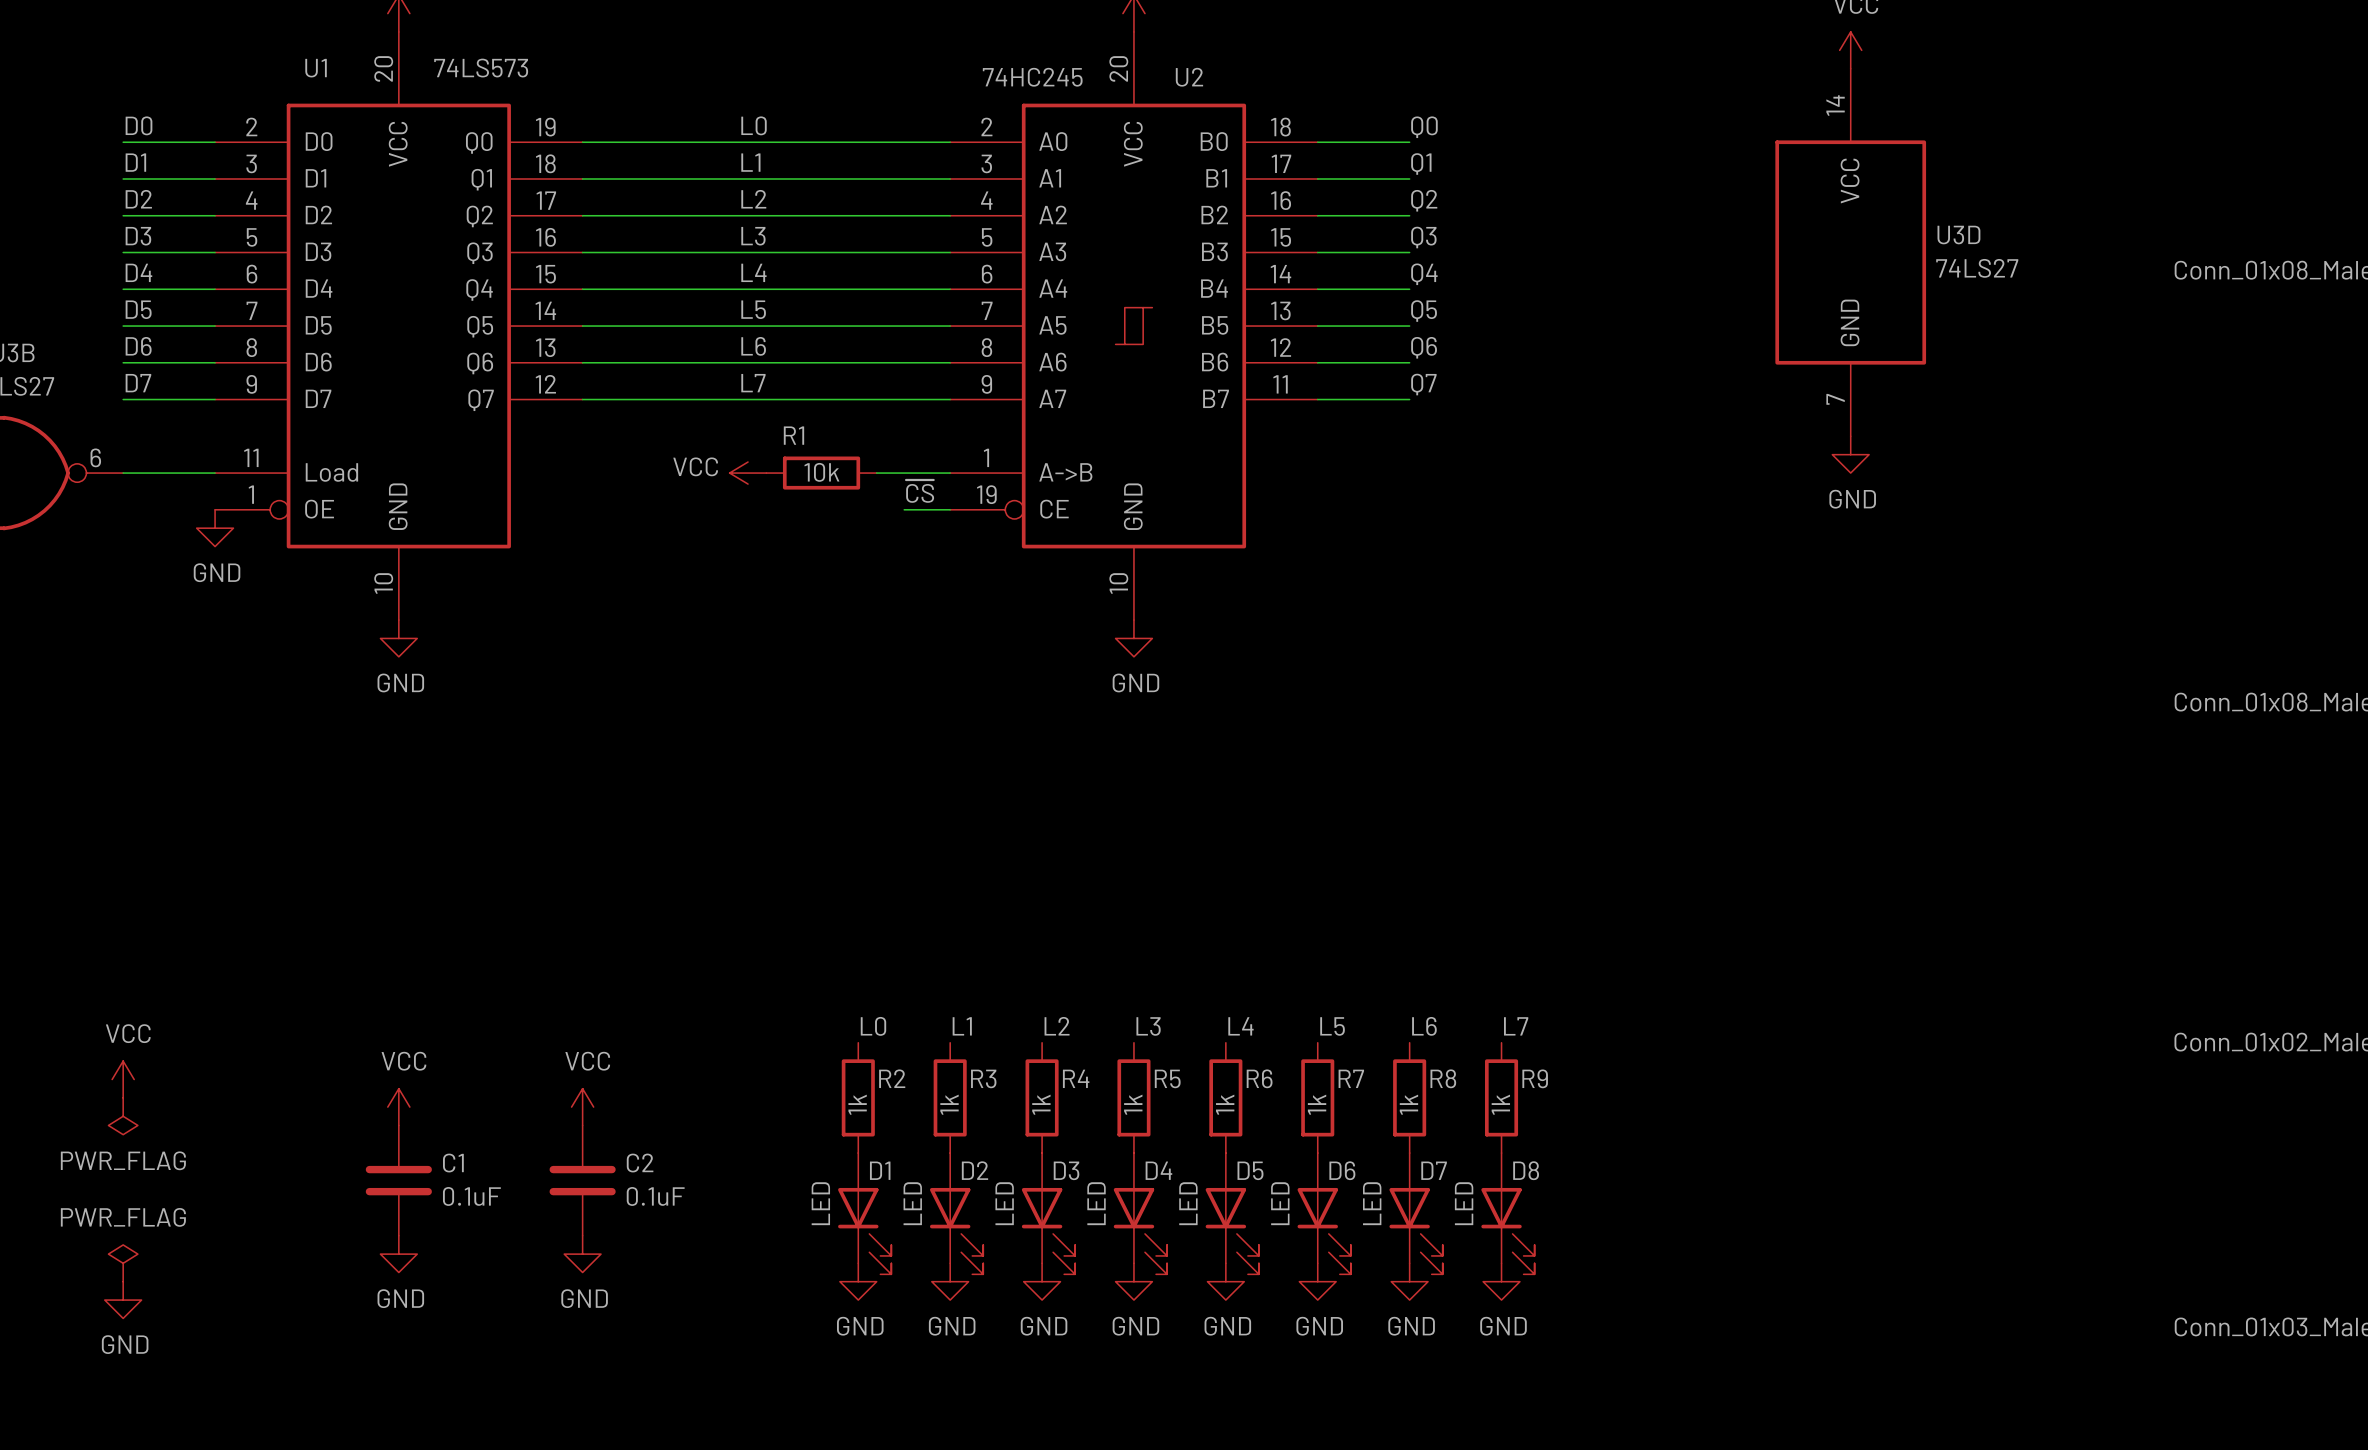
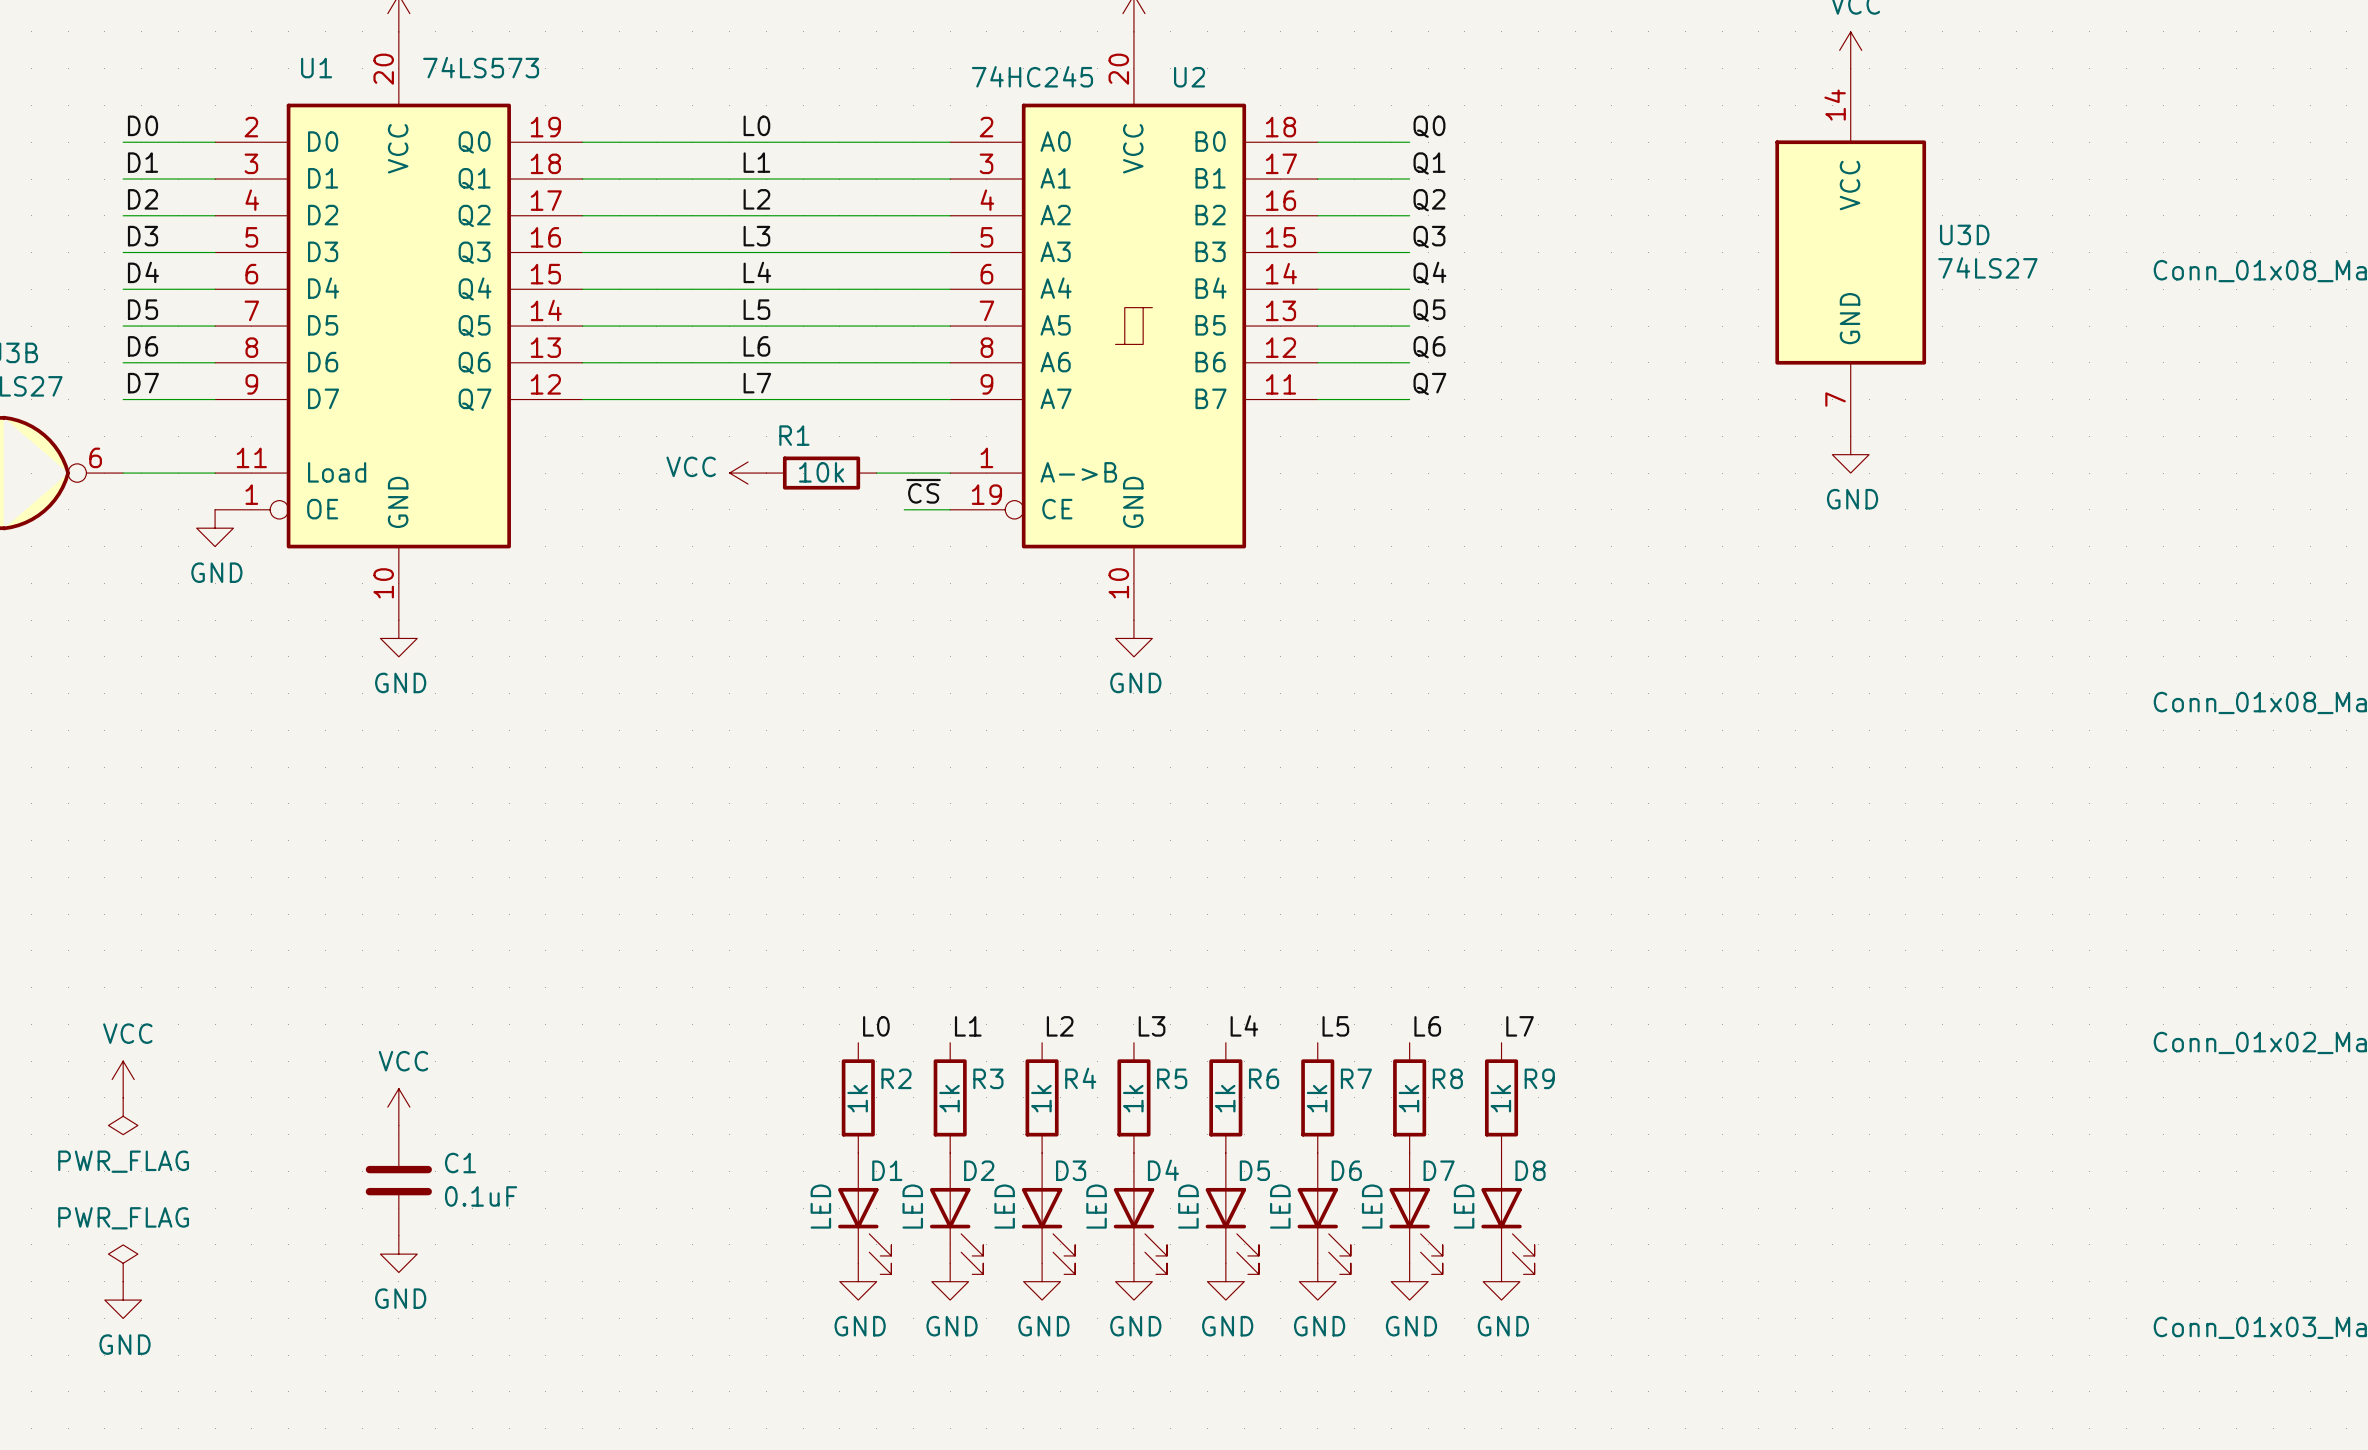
power symbol: VCC (582, 1107) -> none
C2: 0.1uF (582, 1180) -> none
power symbol: GND (582, 1254) -> none

